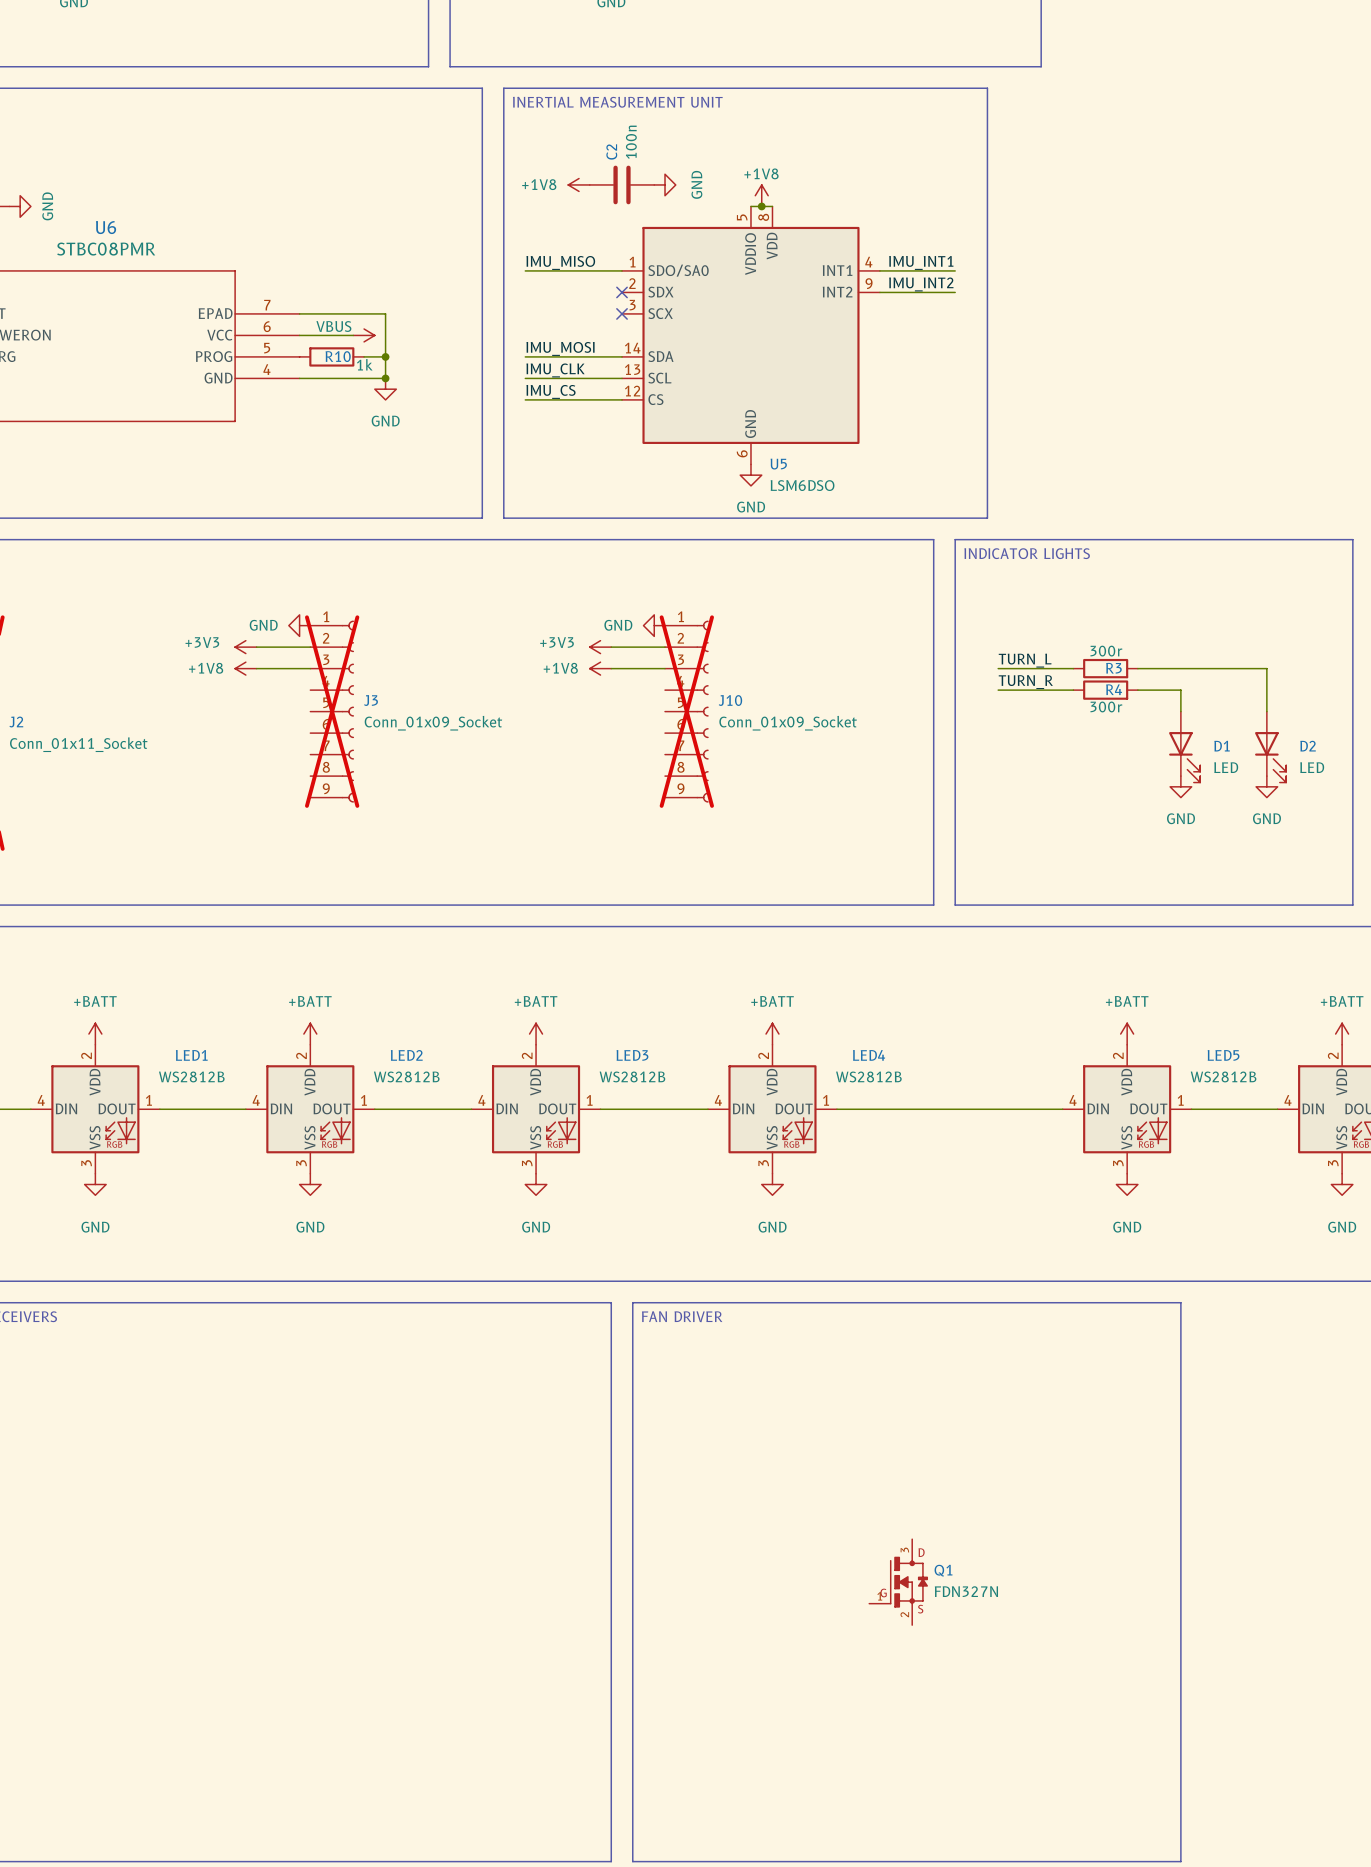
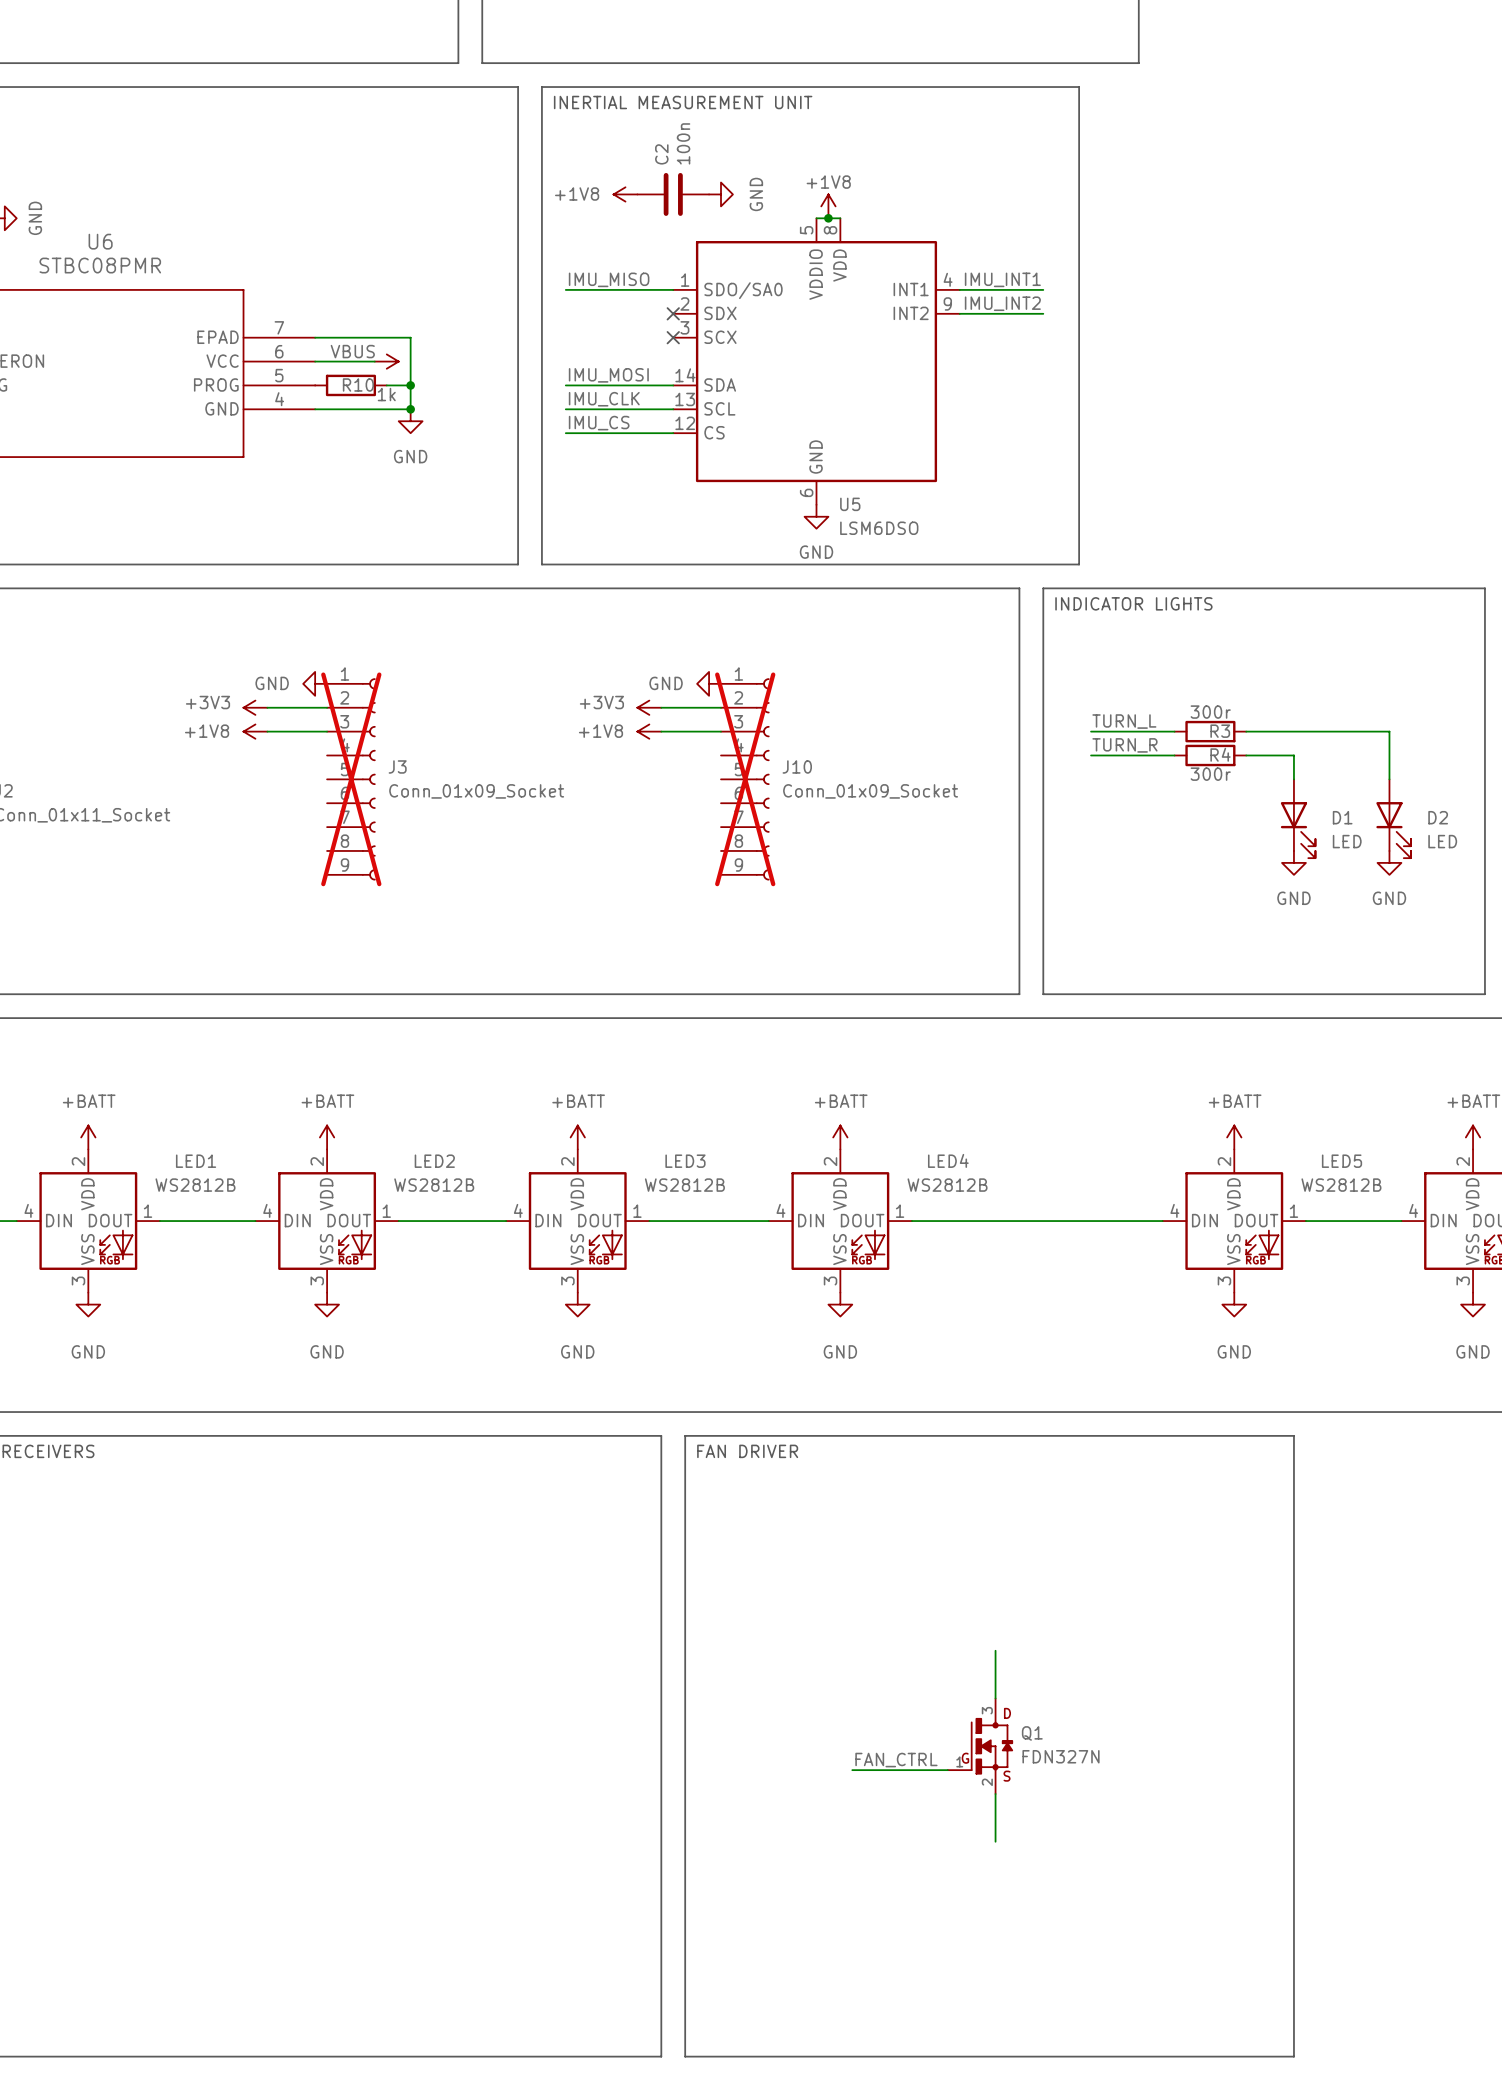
wire: none -> (995, 1650) (995, 1698)
label: none -> FAN_CTRL (896, 1760)
wire: none -> (852, 1770) (947, 1770)
wire: none -> (995, 1794) (995, 1841)

